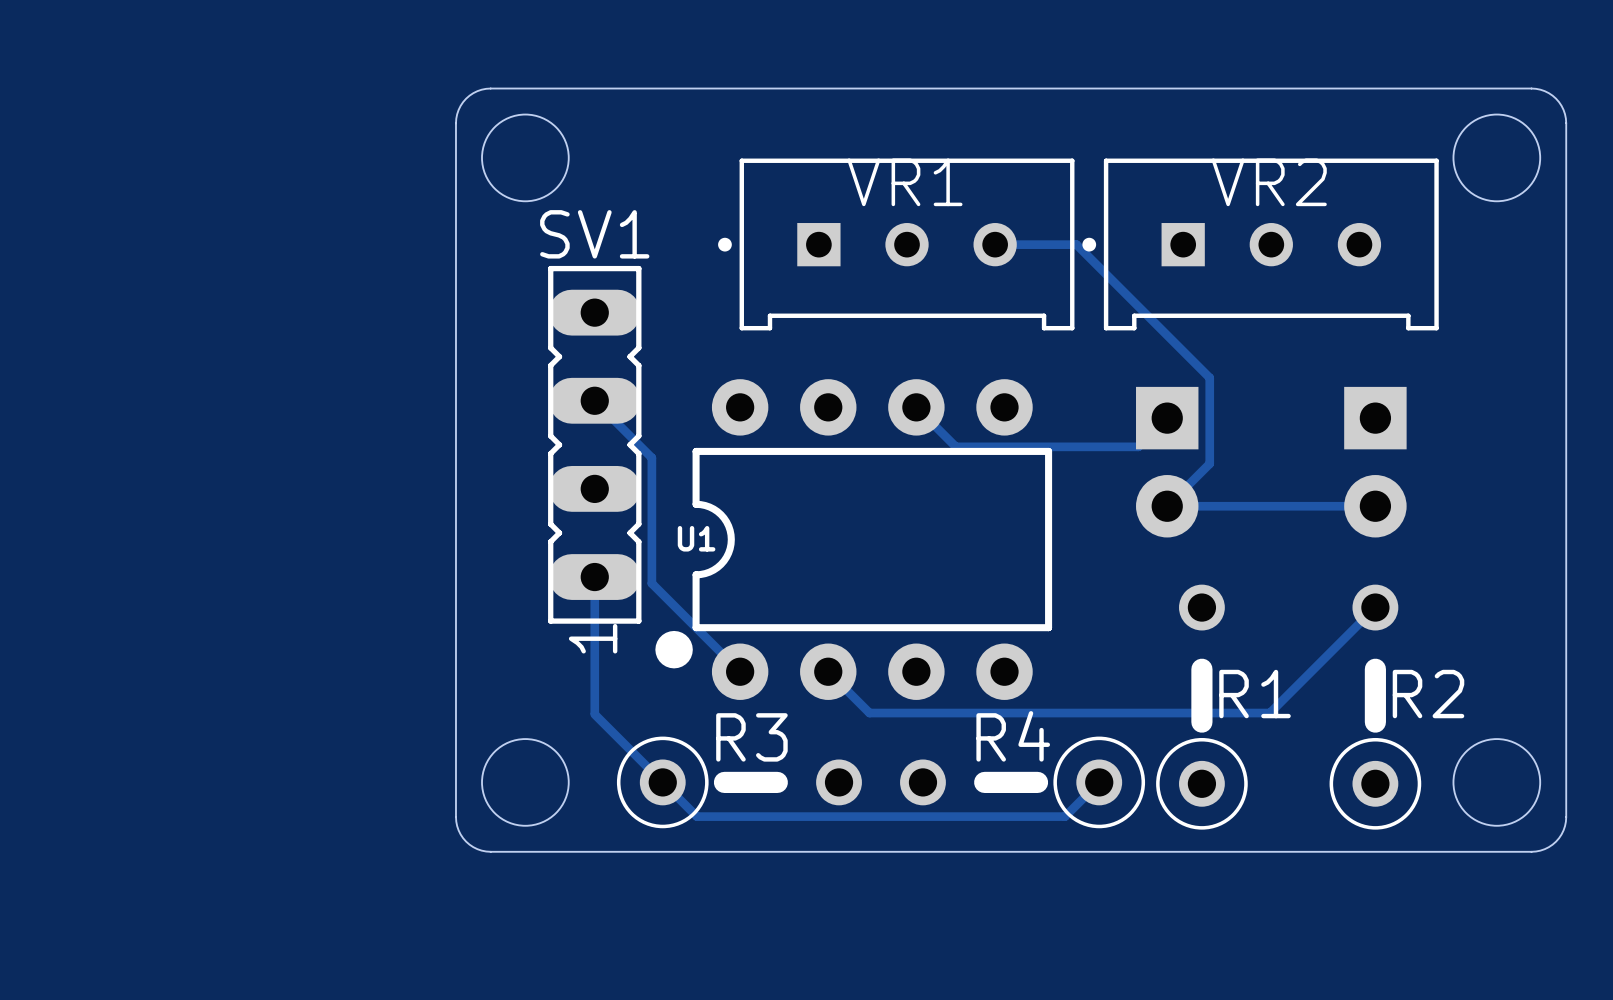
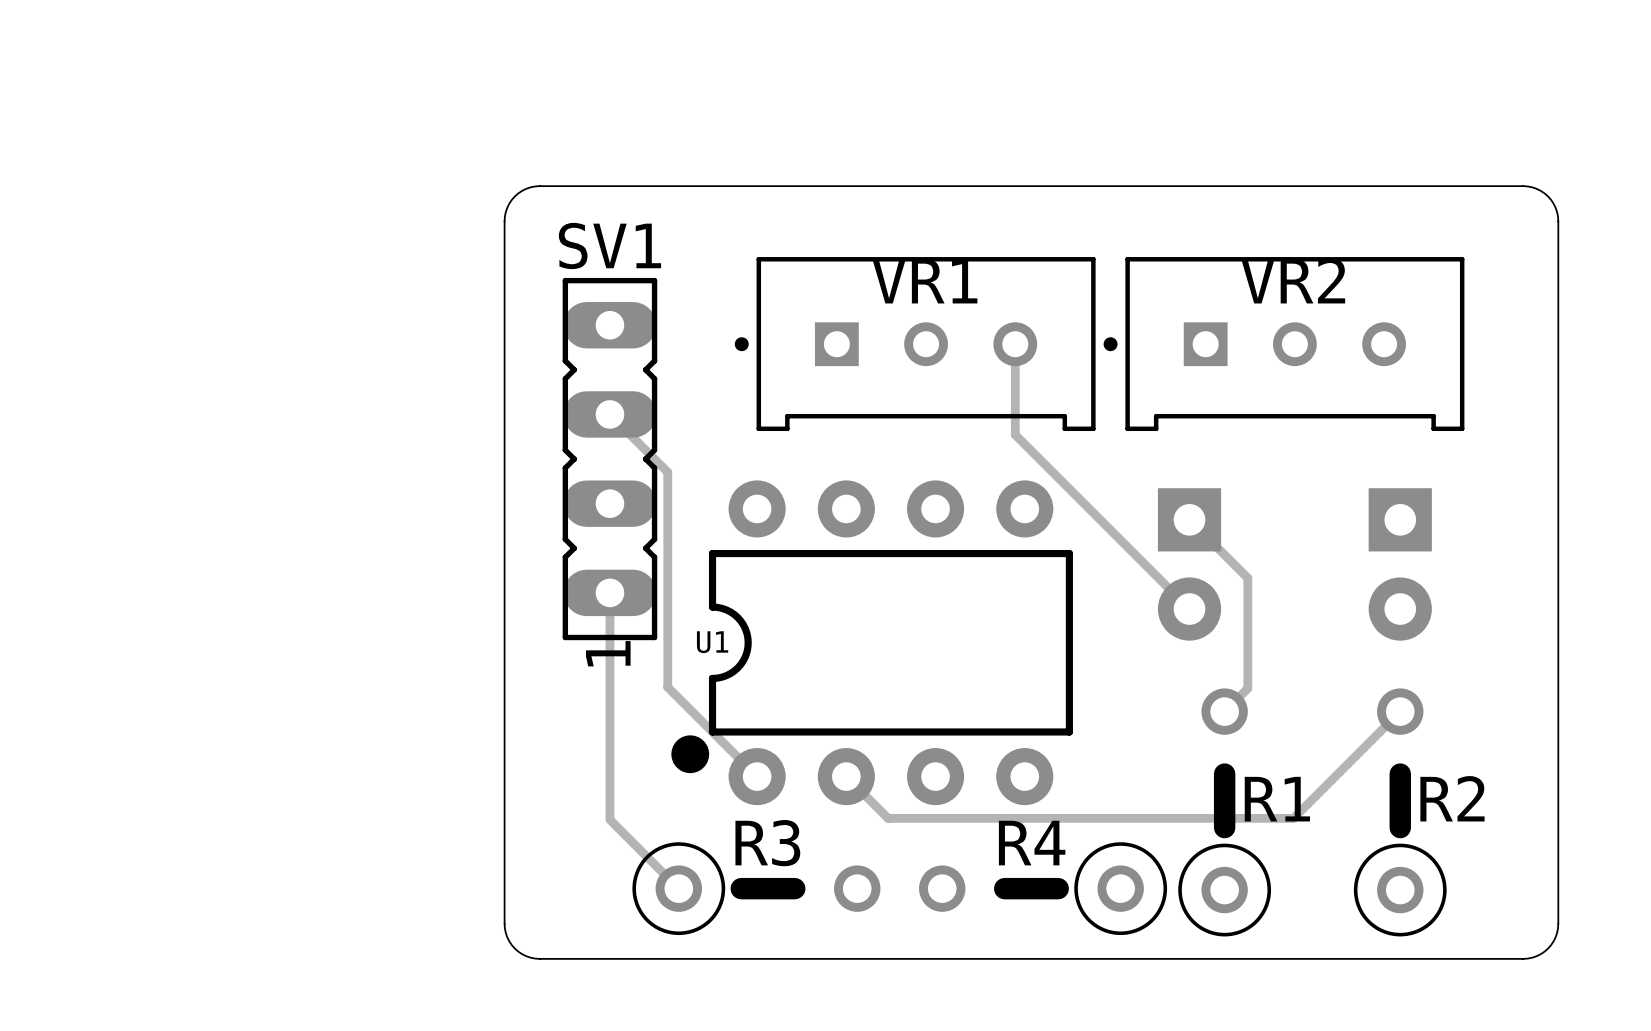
board edge: (525, 88) (486, 88) (473, 93) (460, 105) (455, 123) (456, 821) (463, 838) (477, 849) (490, 851) (525, 851) -> (539, 186) (526, 188) (514, 196) (507, 207) (504, 221) (504, 923) (507, 937) (514, 948) (526, 956) (539, 958)
board edge: (1496, 88) (1536, 88) (1548, 93) (1561, 105) (1566, 123) (1565, 821) (1559, 838) (1544, 849) (1531, 851) (1496, 851) -> (1523, 186) (1536, 188) (1548, 196) (1555, 207) (1558, 221) (1558, 923) (1555, 937) (1548, 948) (1536, 956) (1523, 958)
round board edge: [481, 113, 570, 203] -> none
round board edge: [1452, 113, 1542, 203] -> none
track: (995, 244) (1076, 244) (1209, 377) (1209, 463) (1167, 506) (1375, 506) -> (1015, 344) (1015, 434) (1189, 609)
track: (594, 400) (651, 457) -> (609, 414) (667, 472) (667, 560)
track: (916, 407) (955, 446) (1138, 446) (1167, 418) -> (1224, 711) (1247, 688) (1247, 578) (1189, 519)
SV1 position: (594, 444) -> (609, 459)
track: none -> (609, 592) (609, 680)
round board edge: [481, 738, 570, 827] -> none
round board edge: [1452, 738, 1542, 827] -> none
track: (662, 782) (696, 816) (1065, 816) (1099, 782) -> none

